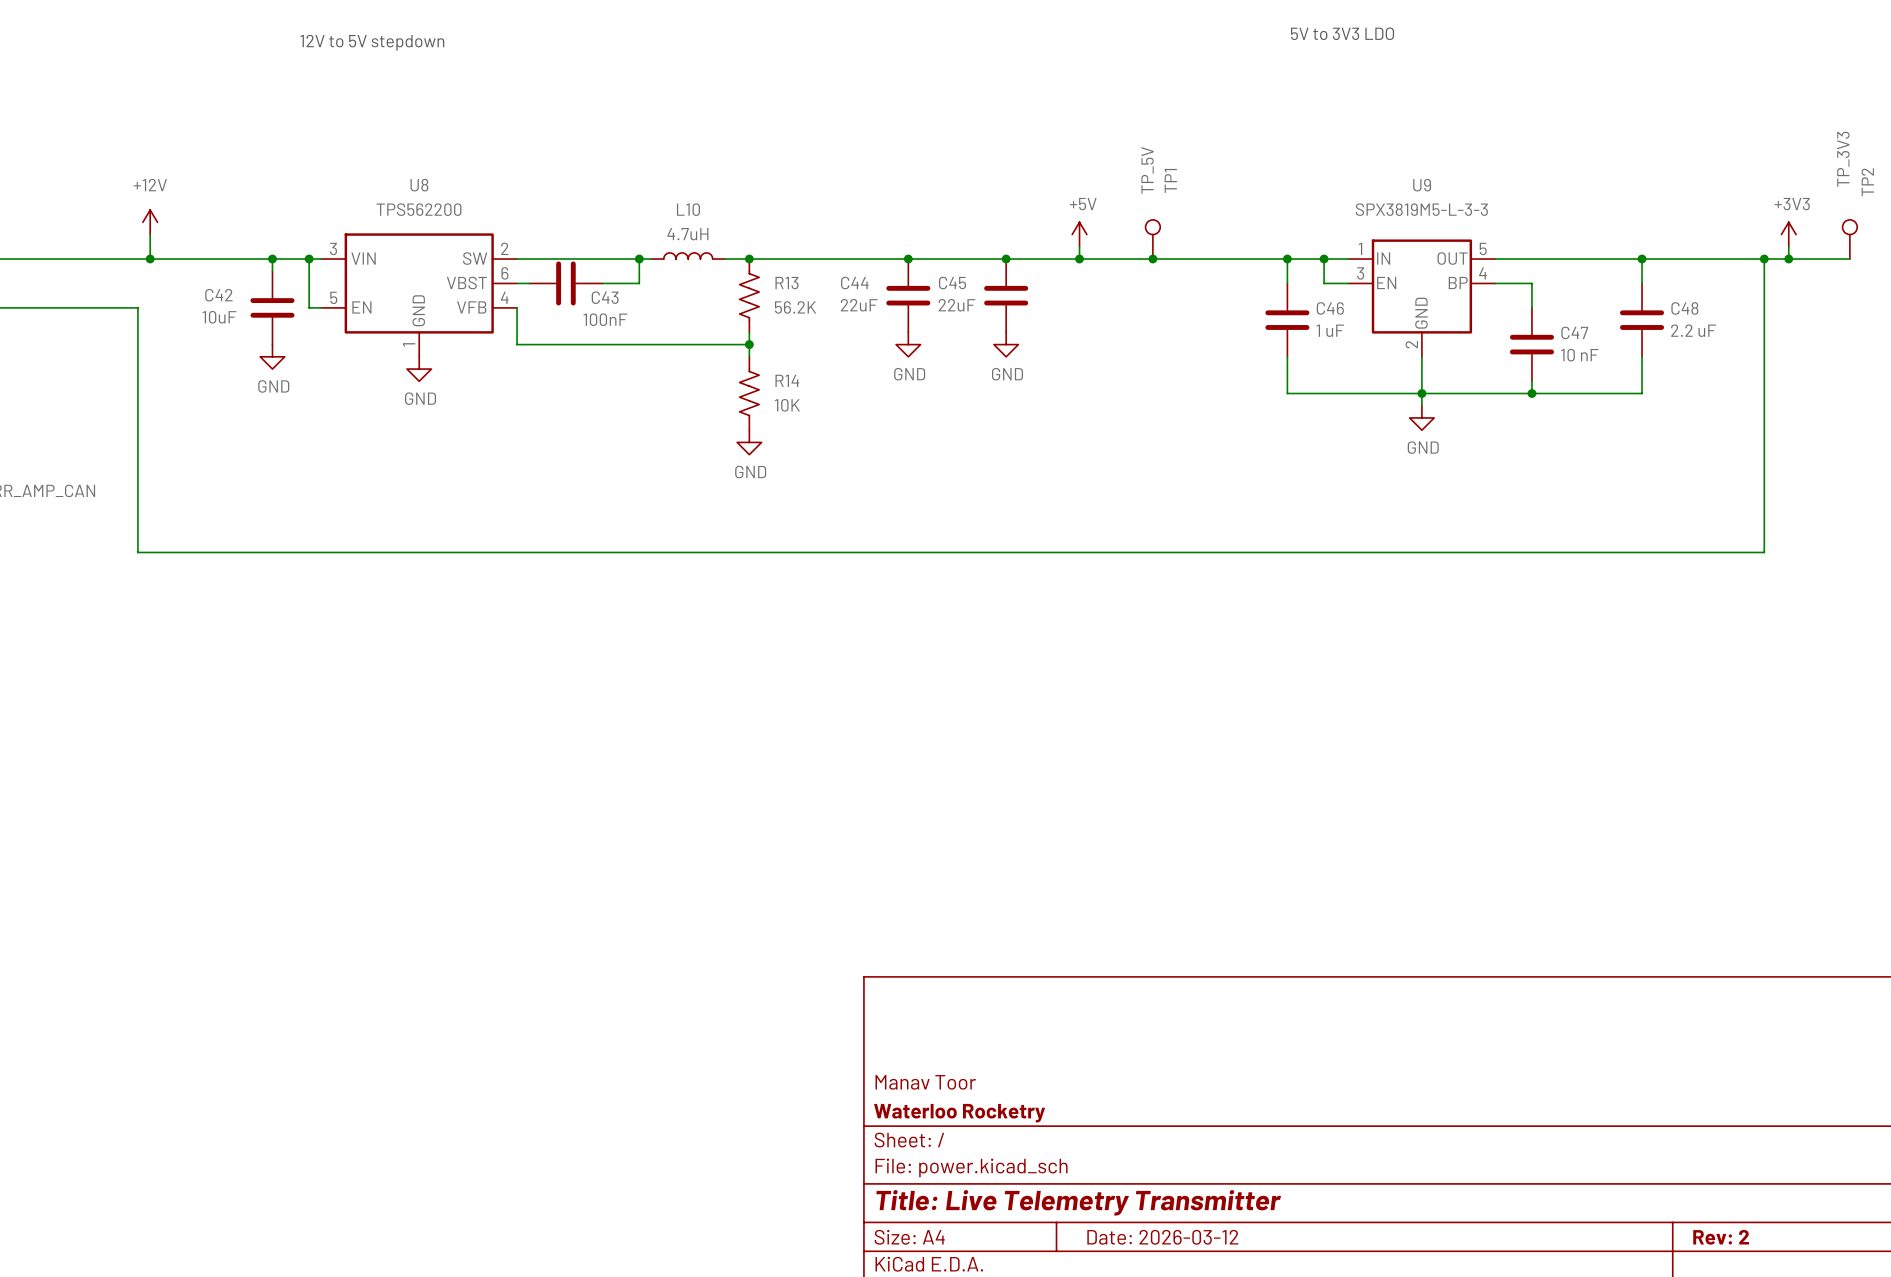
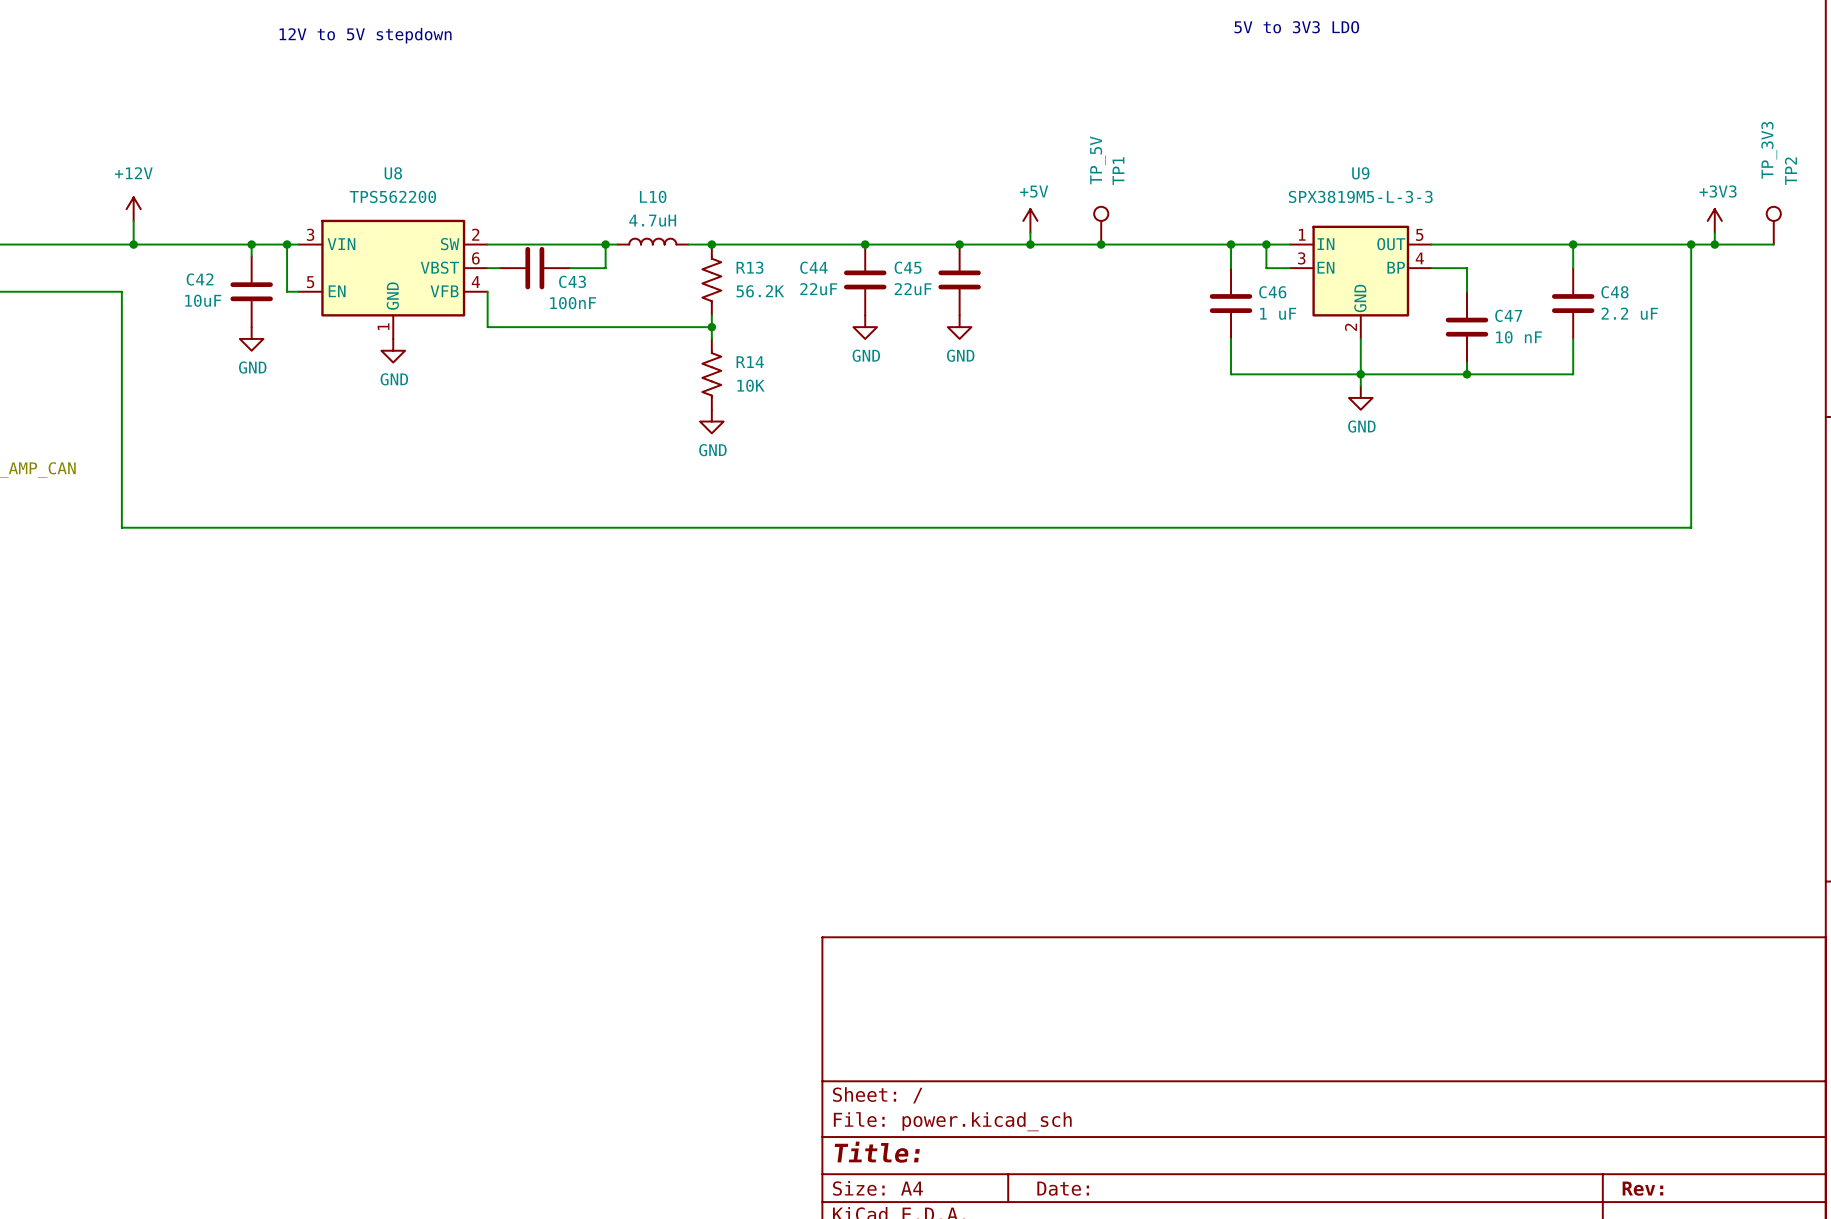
title block: Manav Toor (925, 1082) -> none
title block: Waterloo Rocketry (959, 1113) -> none
title block: Title: Live Telemetry Transmitter (1078, 1202) -> Title: (877, 1152)
title block: Date: 2026-03-12 (1162, 1237) -> Date: (1063, 1188)
title block: Rev: 2 (1721, 1237) -> Rev: (1642, 1188)

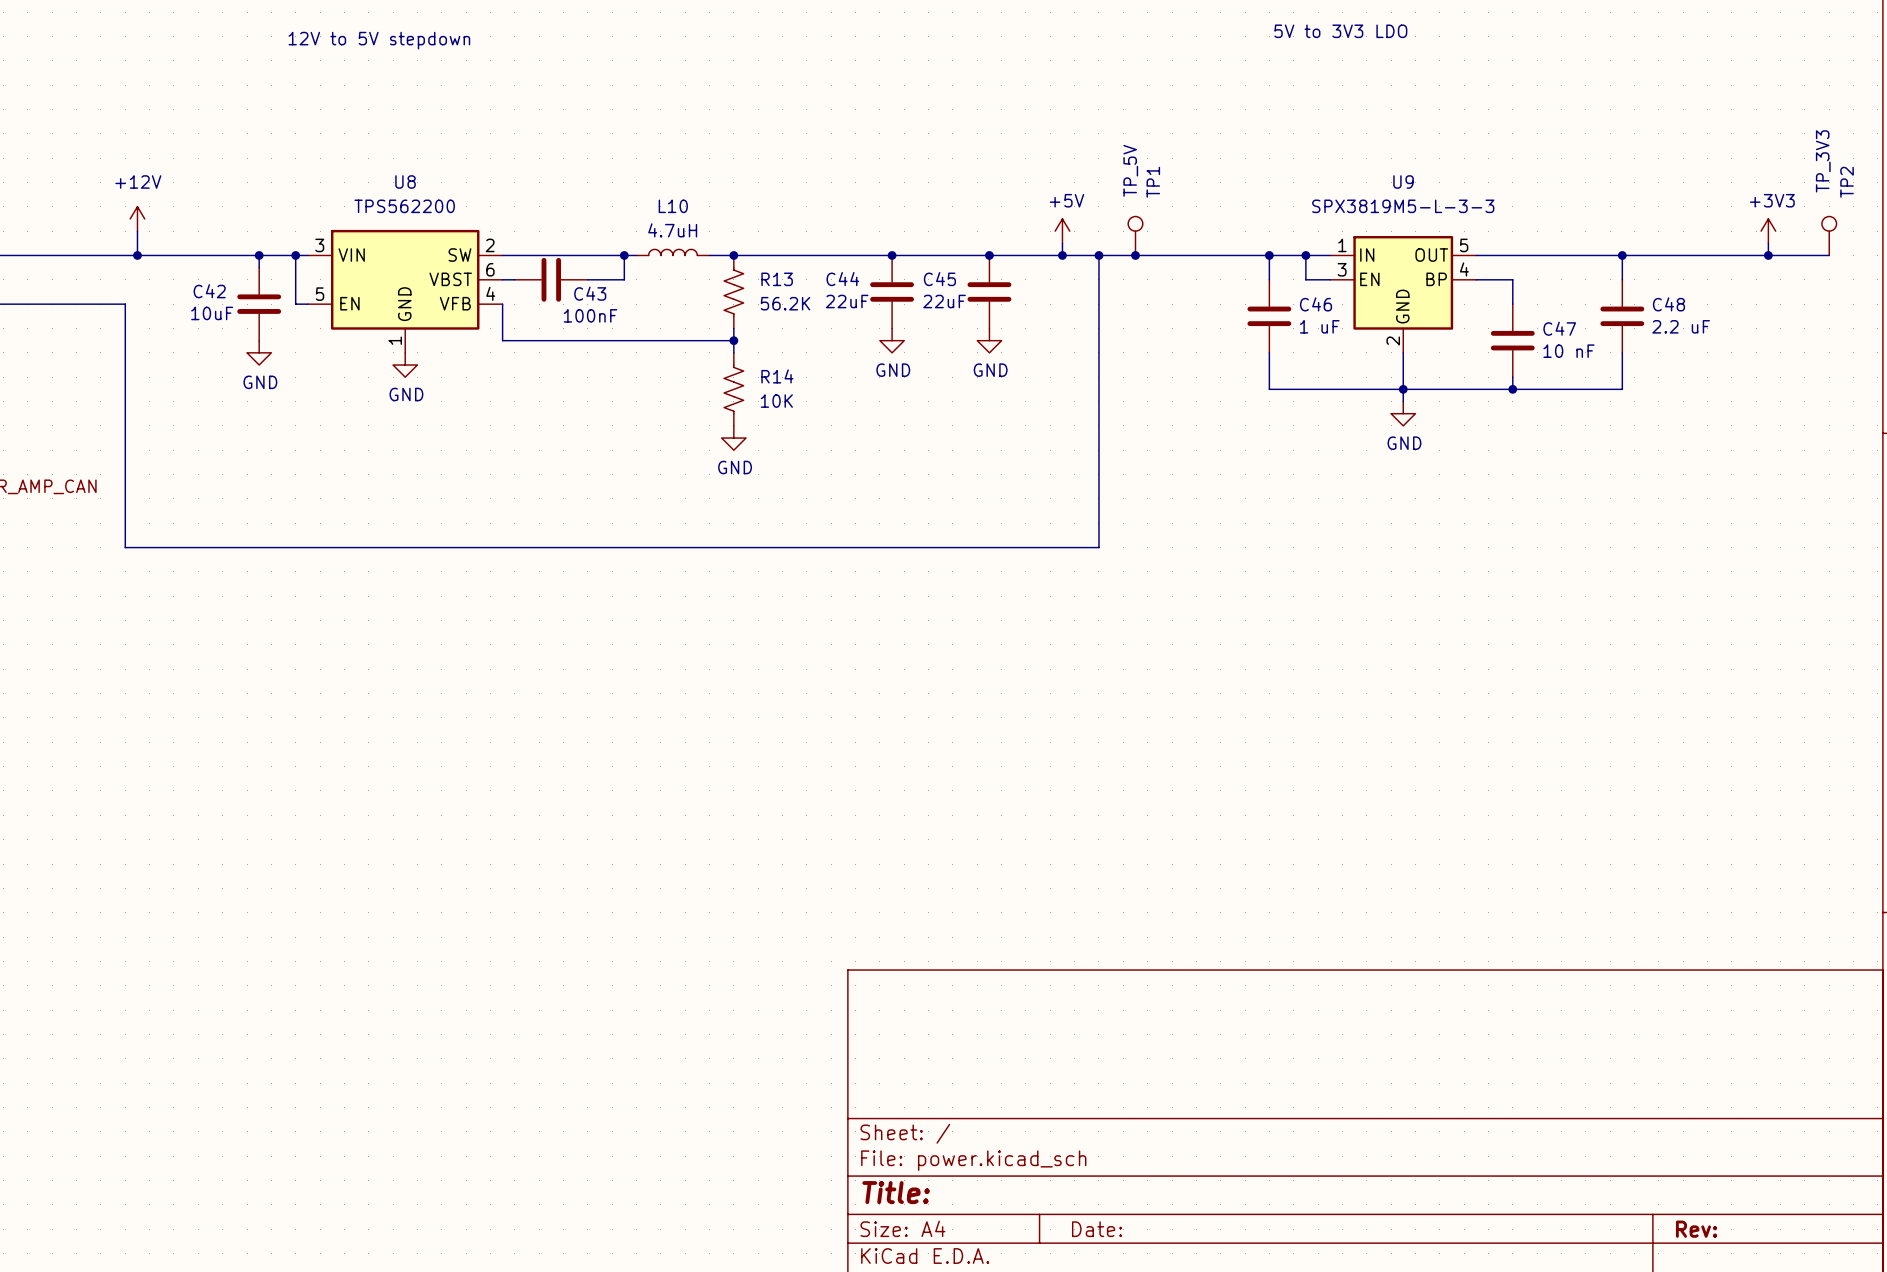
junction: none -> (1098, 255)
wire: (1691, 244) (1691, 527) (1065, 527) -> (1098, 255) (1098, 547)
junction: (1691, 244) -> none

